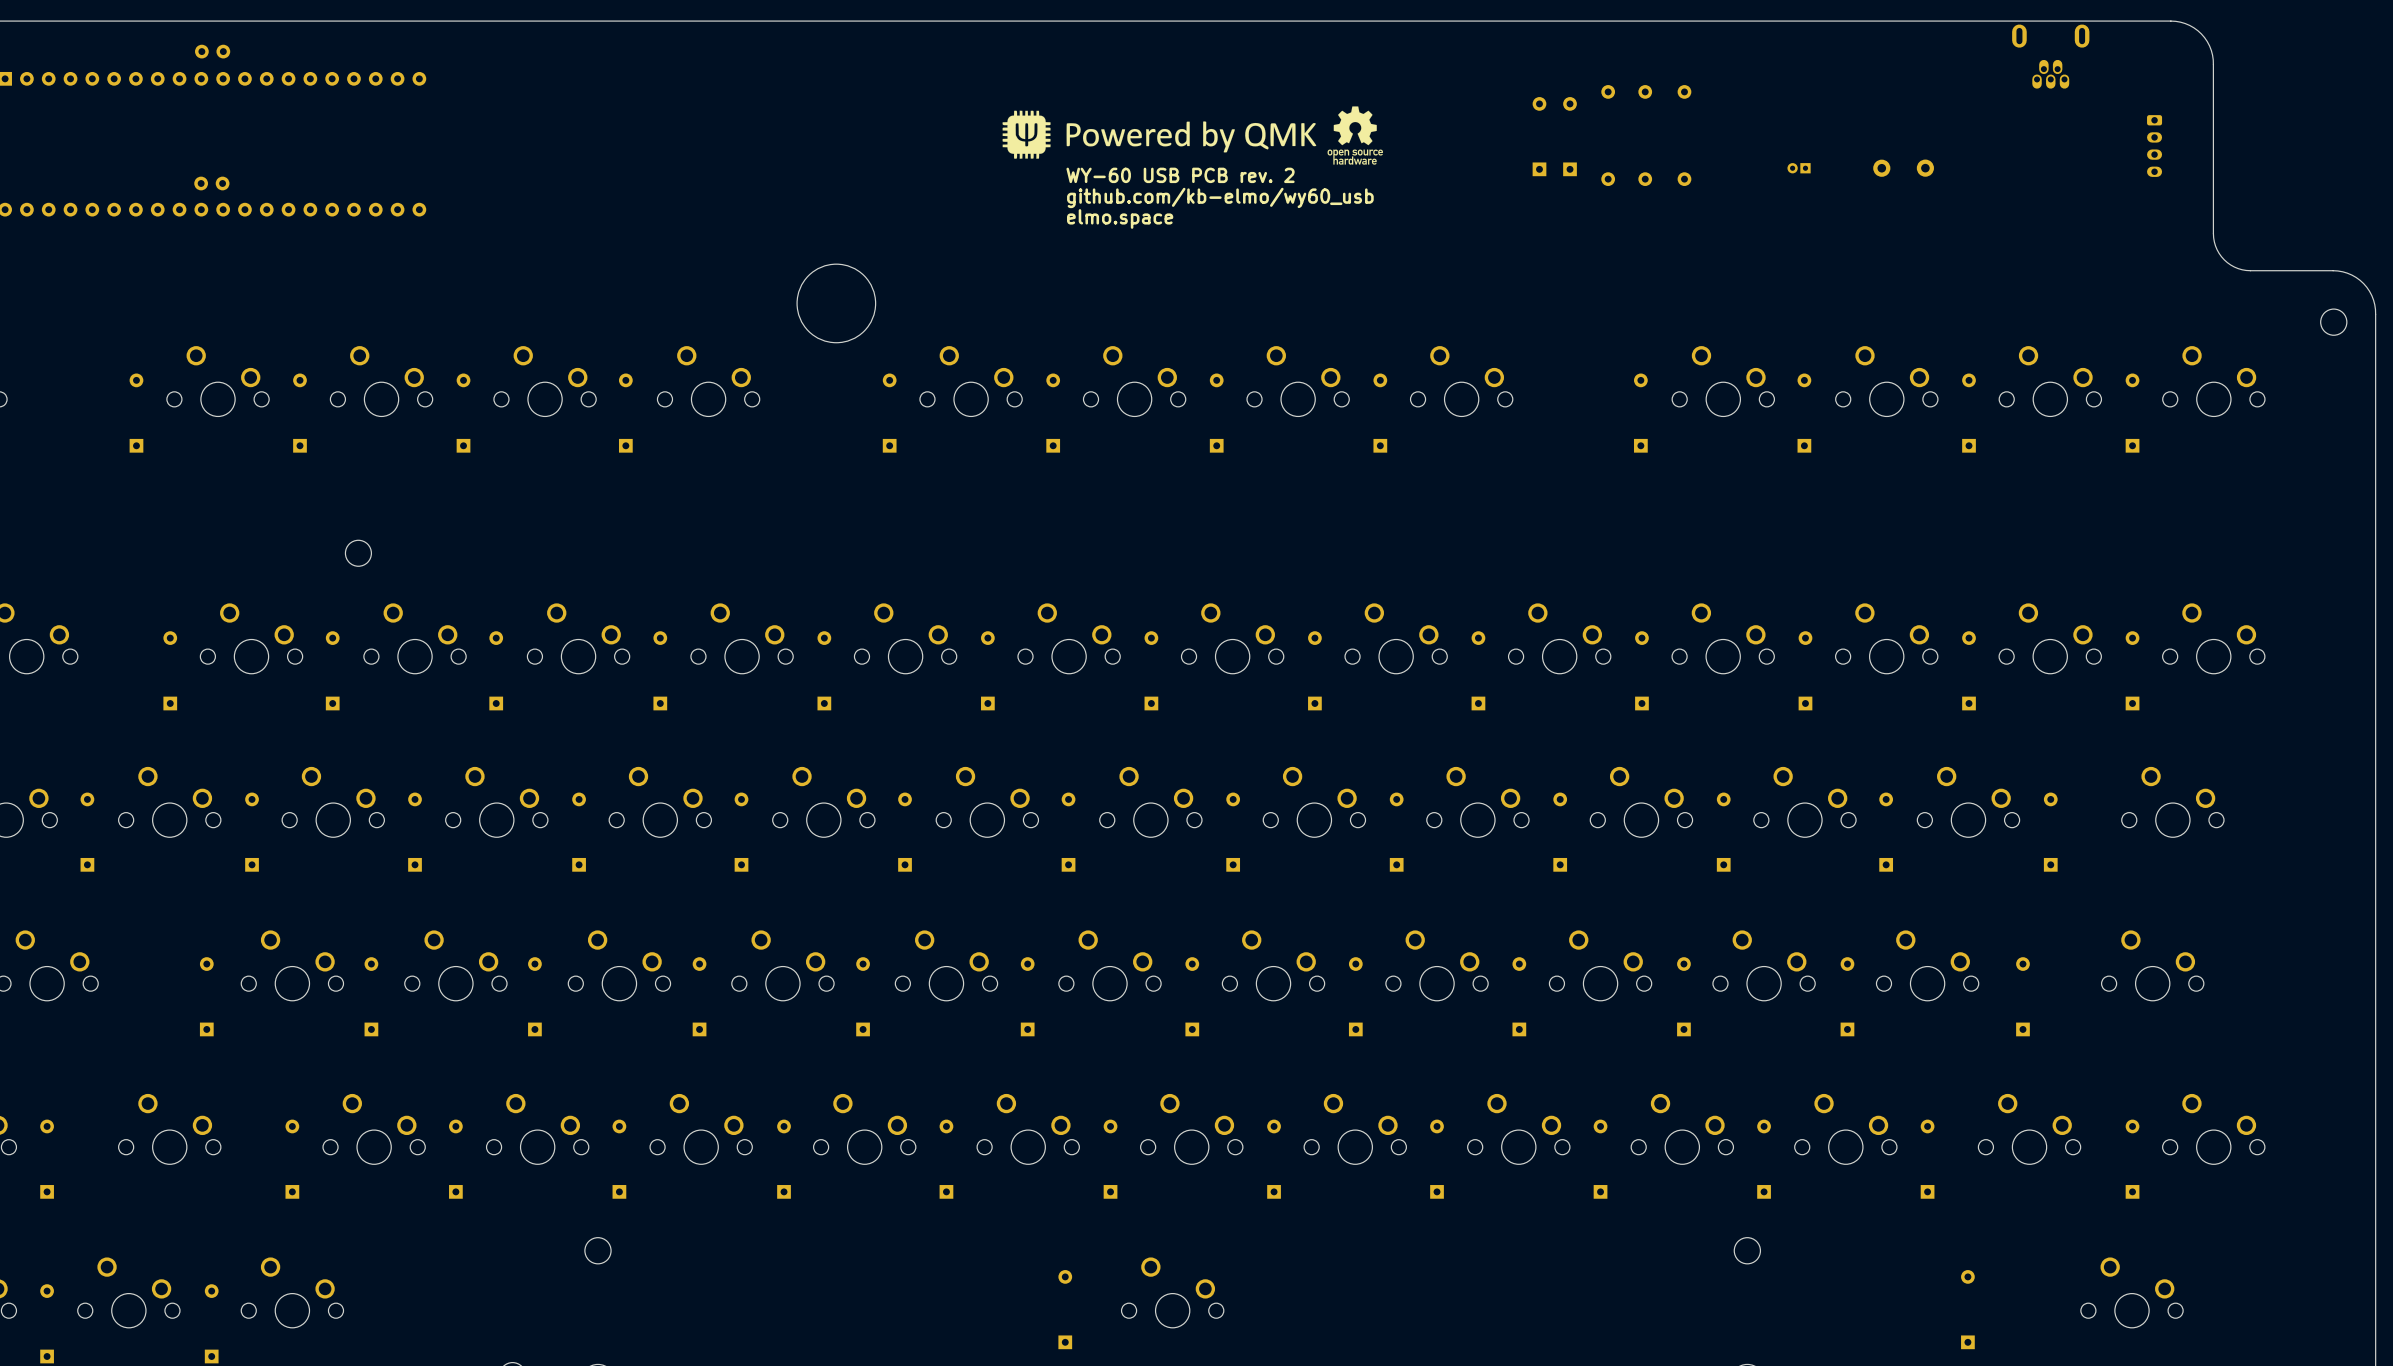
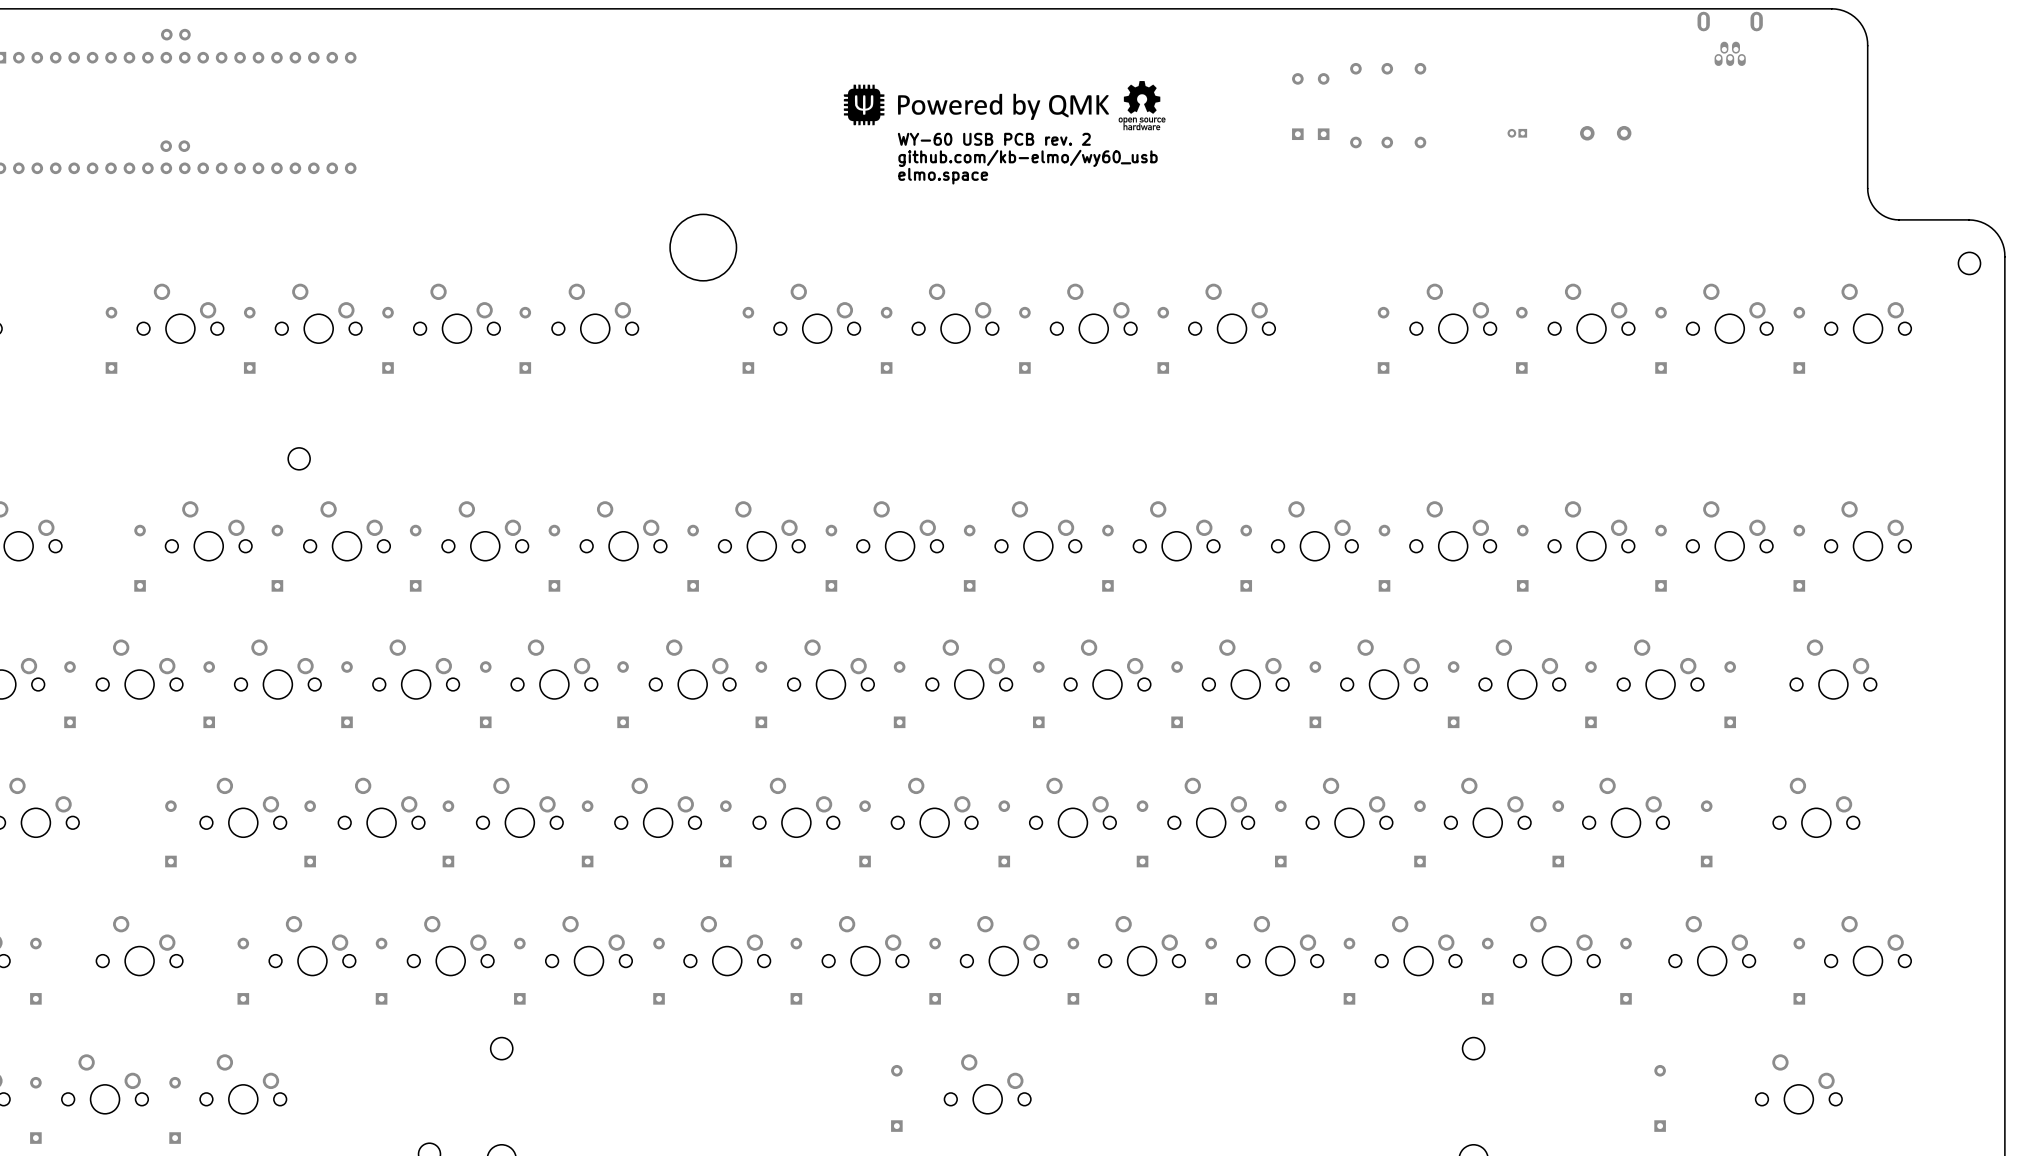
part: (2154, 146) -> none

